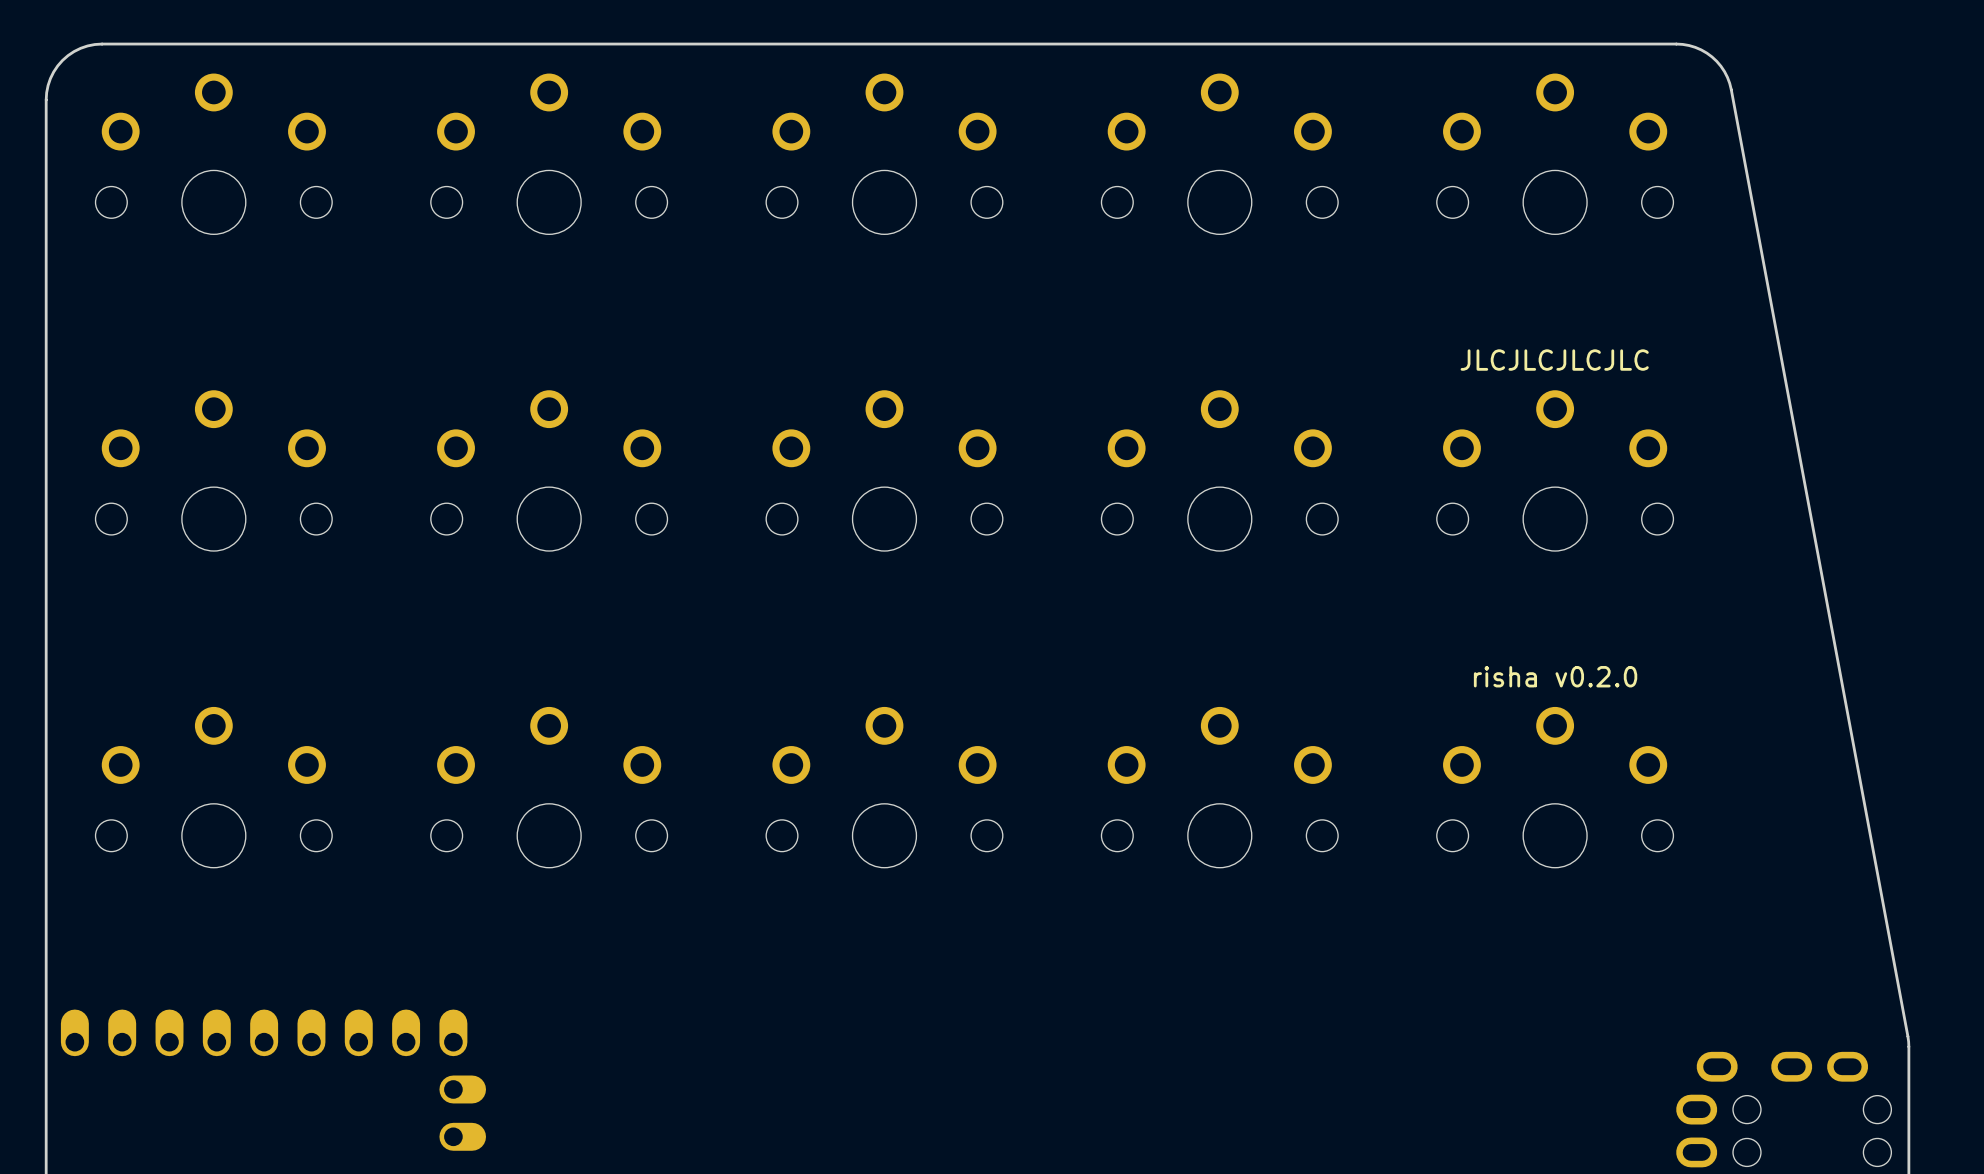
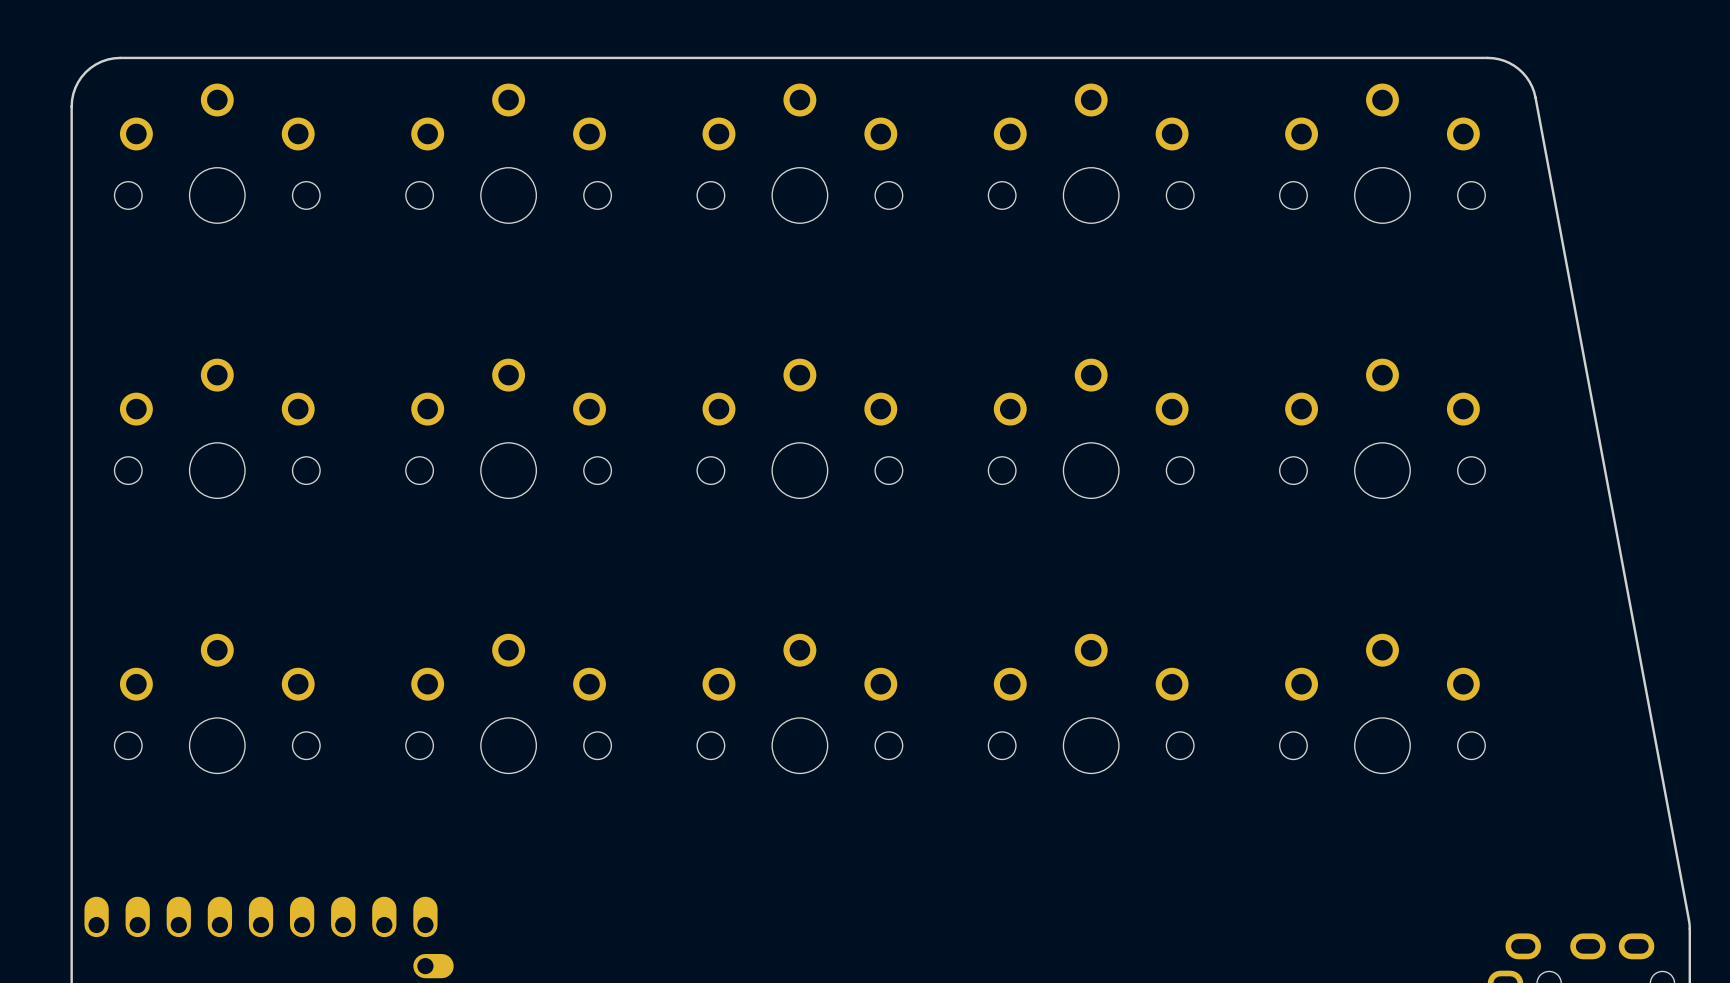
text: JLCJLCJLCJLC (1554, 360) -> none
text: risha v0.2.0 (1555, 676) -> none

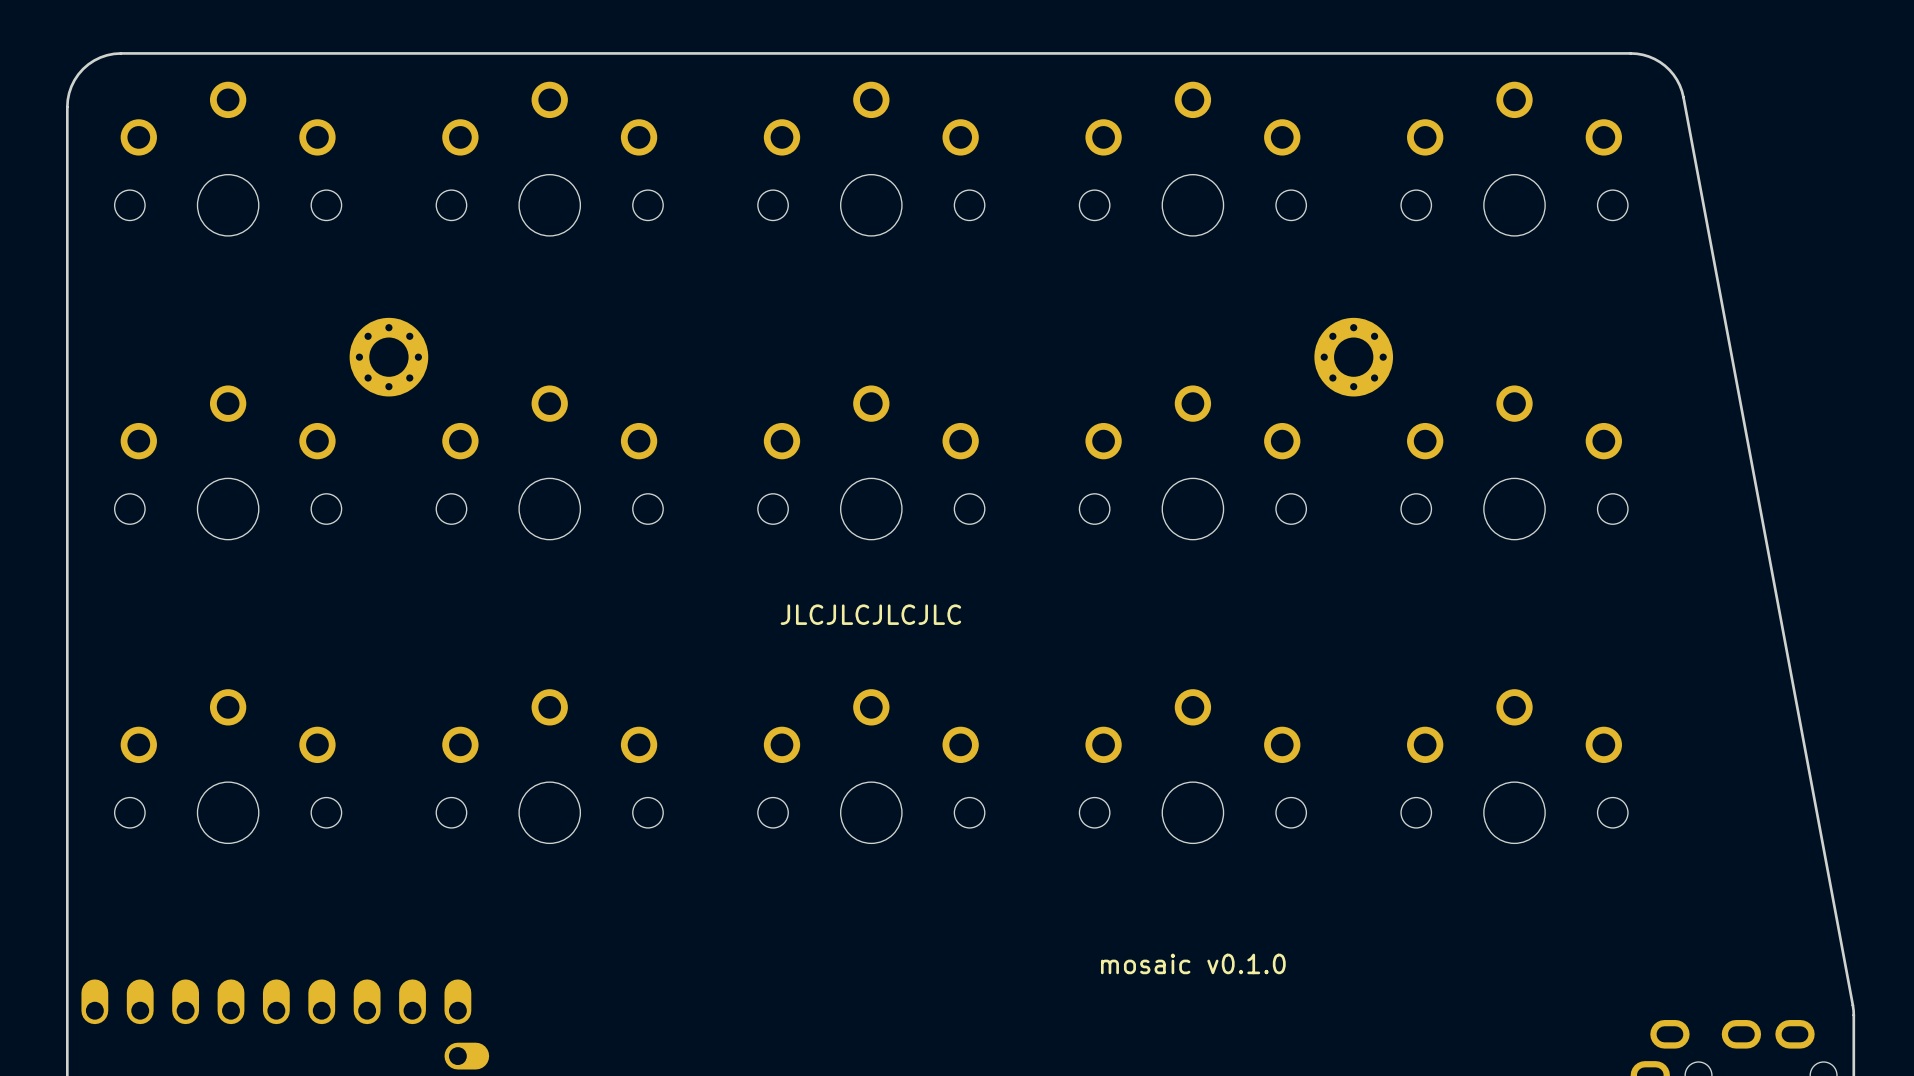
part: none -> (388, 357)
part: none -> (1353, 357)
text: none -> JLCJLCJLCJLC (870, 614)
text: none -> mosaic v0.1.0 (1193, 963)

